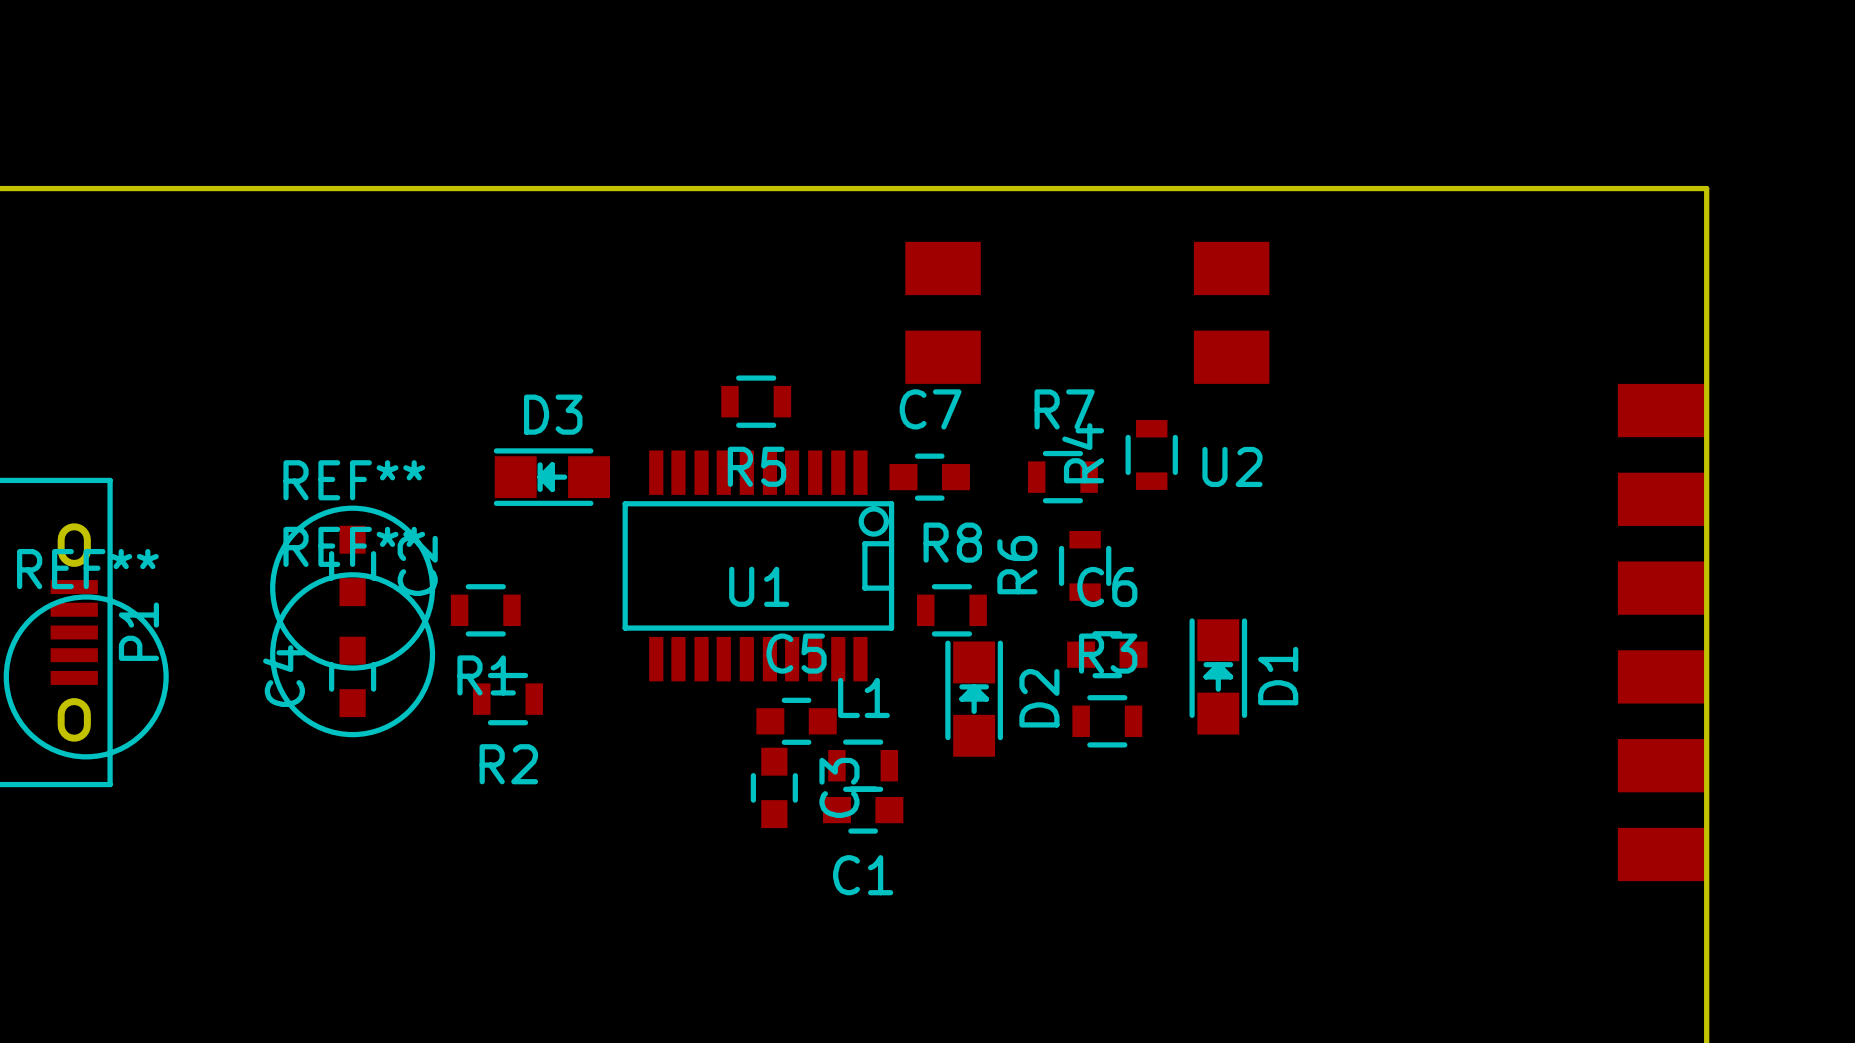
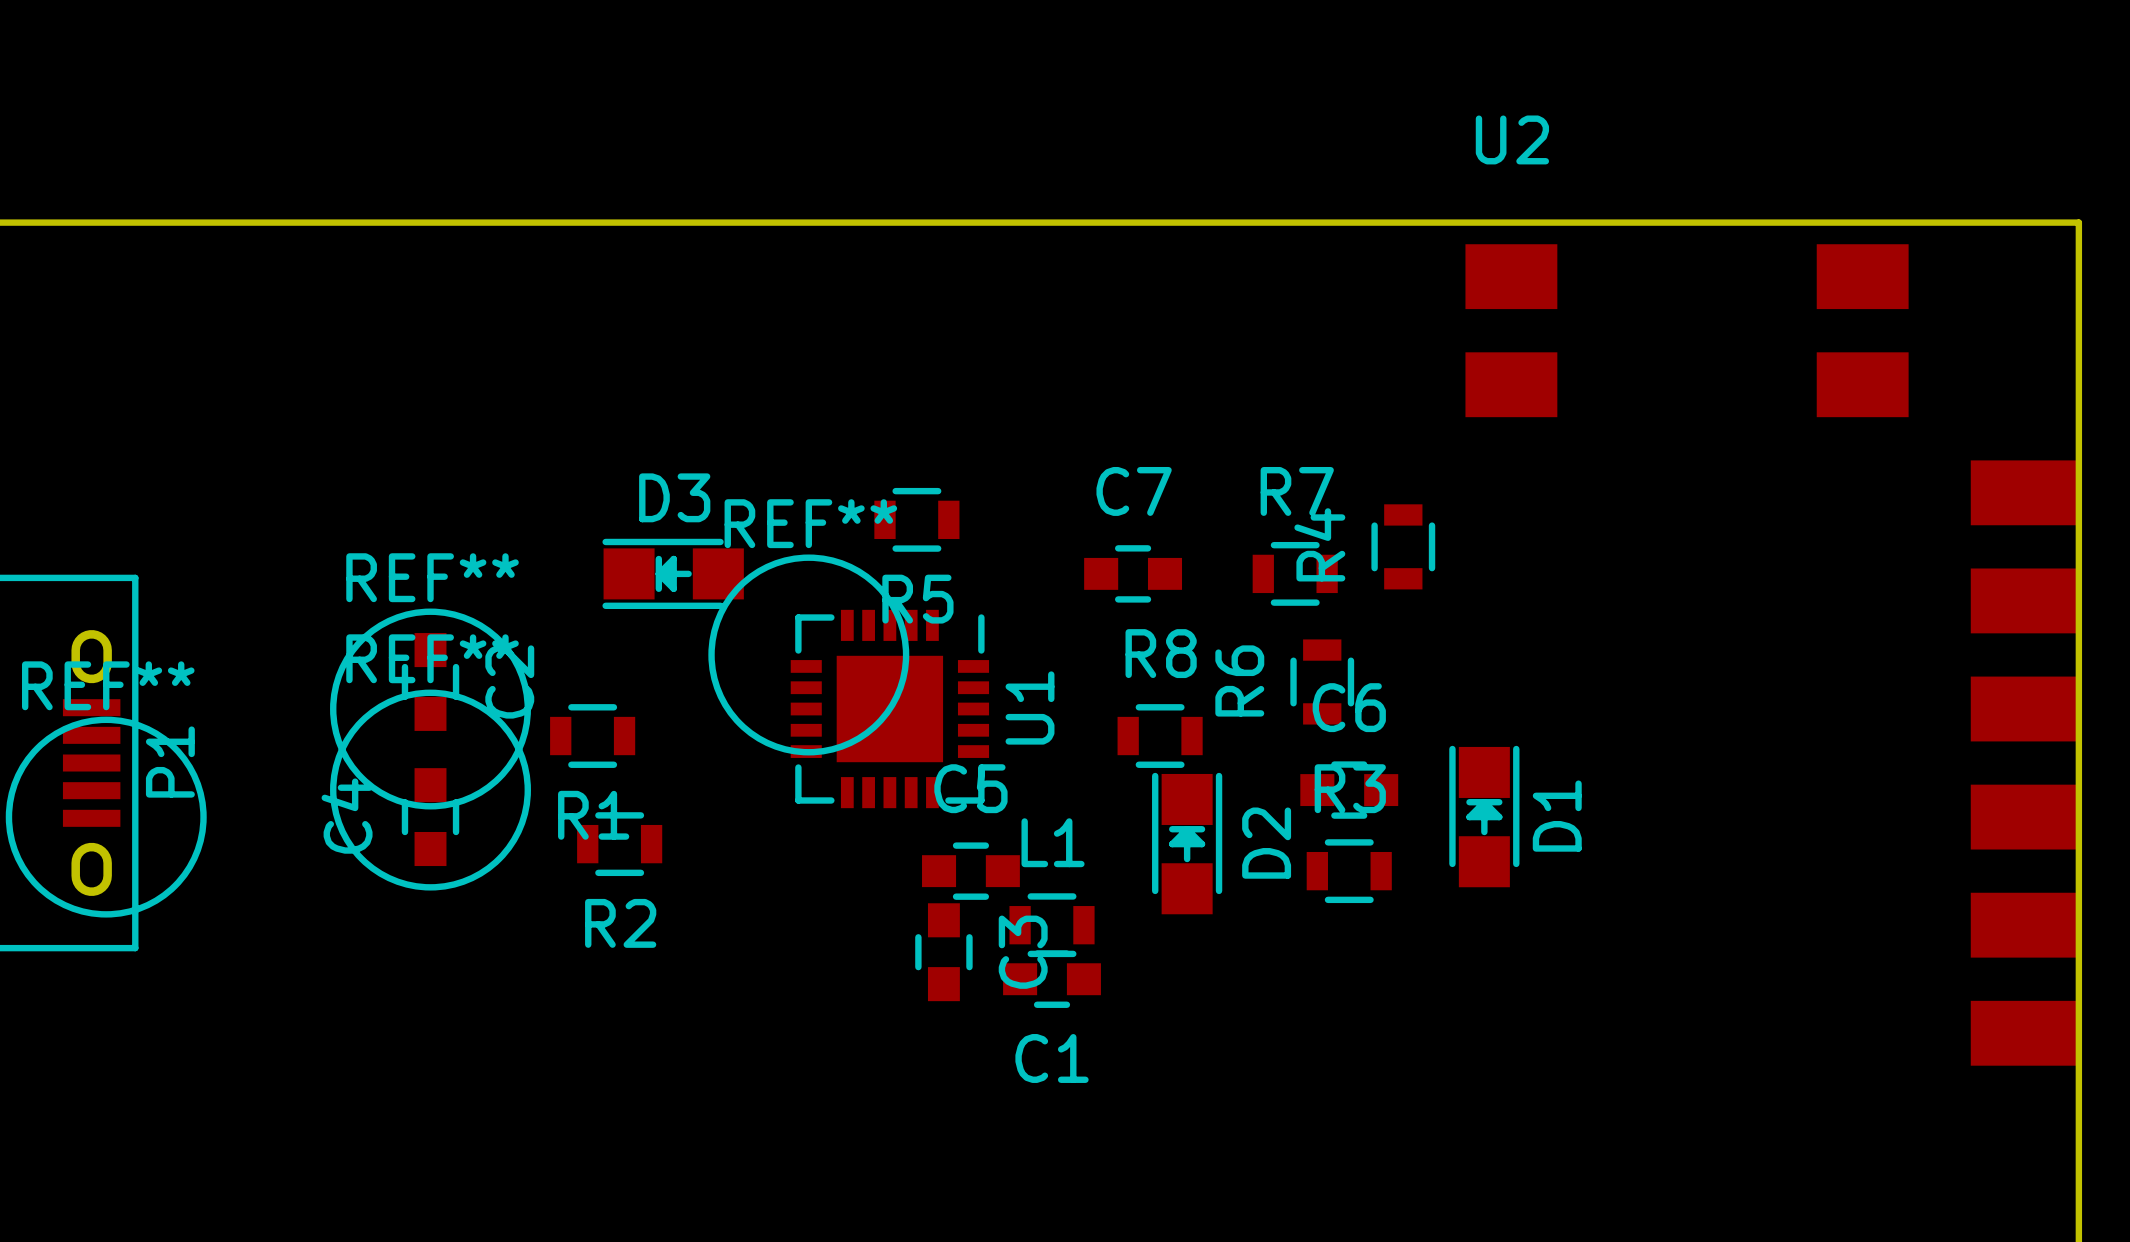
U2 position: (1087, 312) -> (1687, 330)
R5 position: (756, 401) -> (916, 519)
U1 footprint: [622, 450, 895, 682] -> [790, 609, 990, 809]
U2 name position: U2 (1232, 466) -> U2 (1512, 139)
REF**: none -> (808, 654)
U1 name position: U1 (759, 586) -> U1 (1030, 707)

